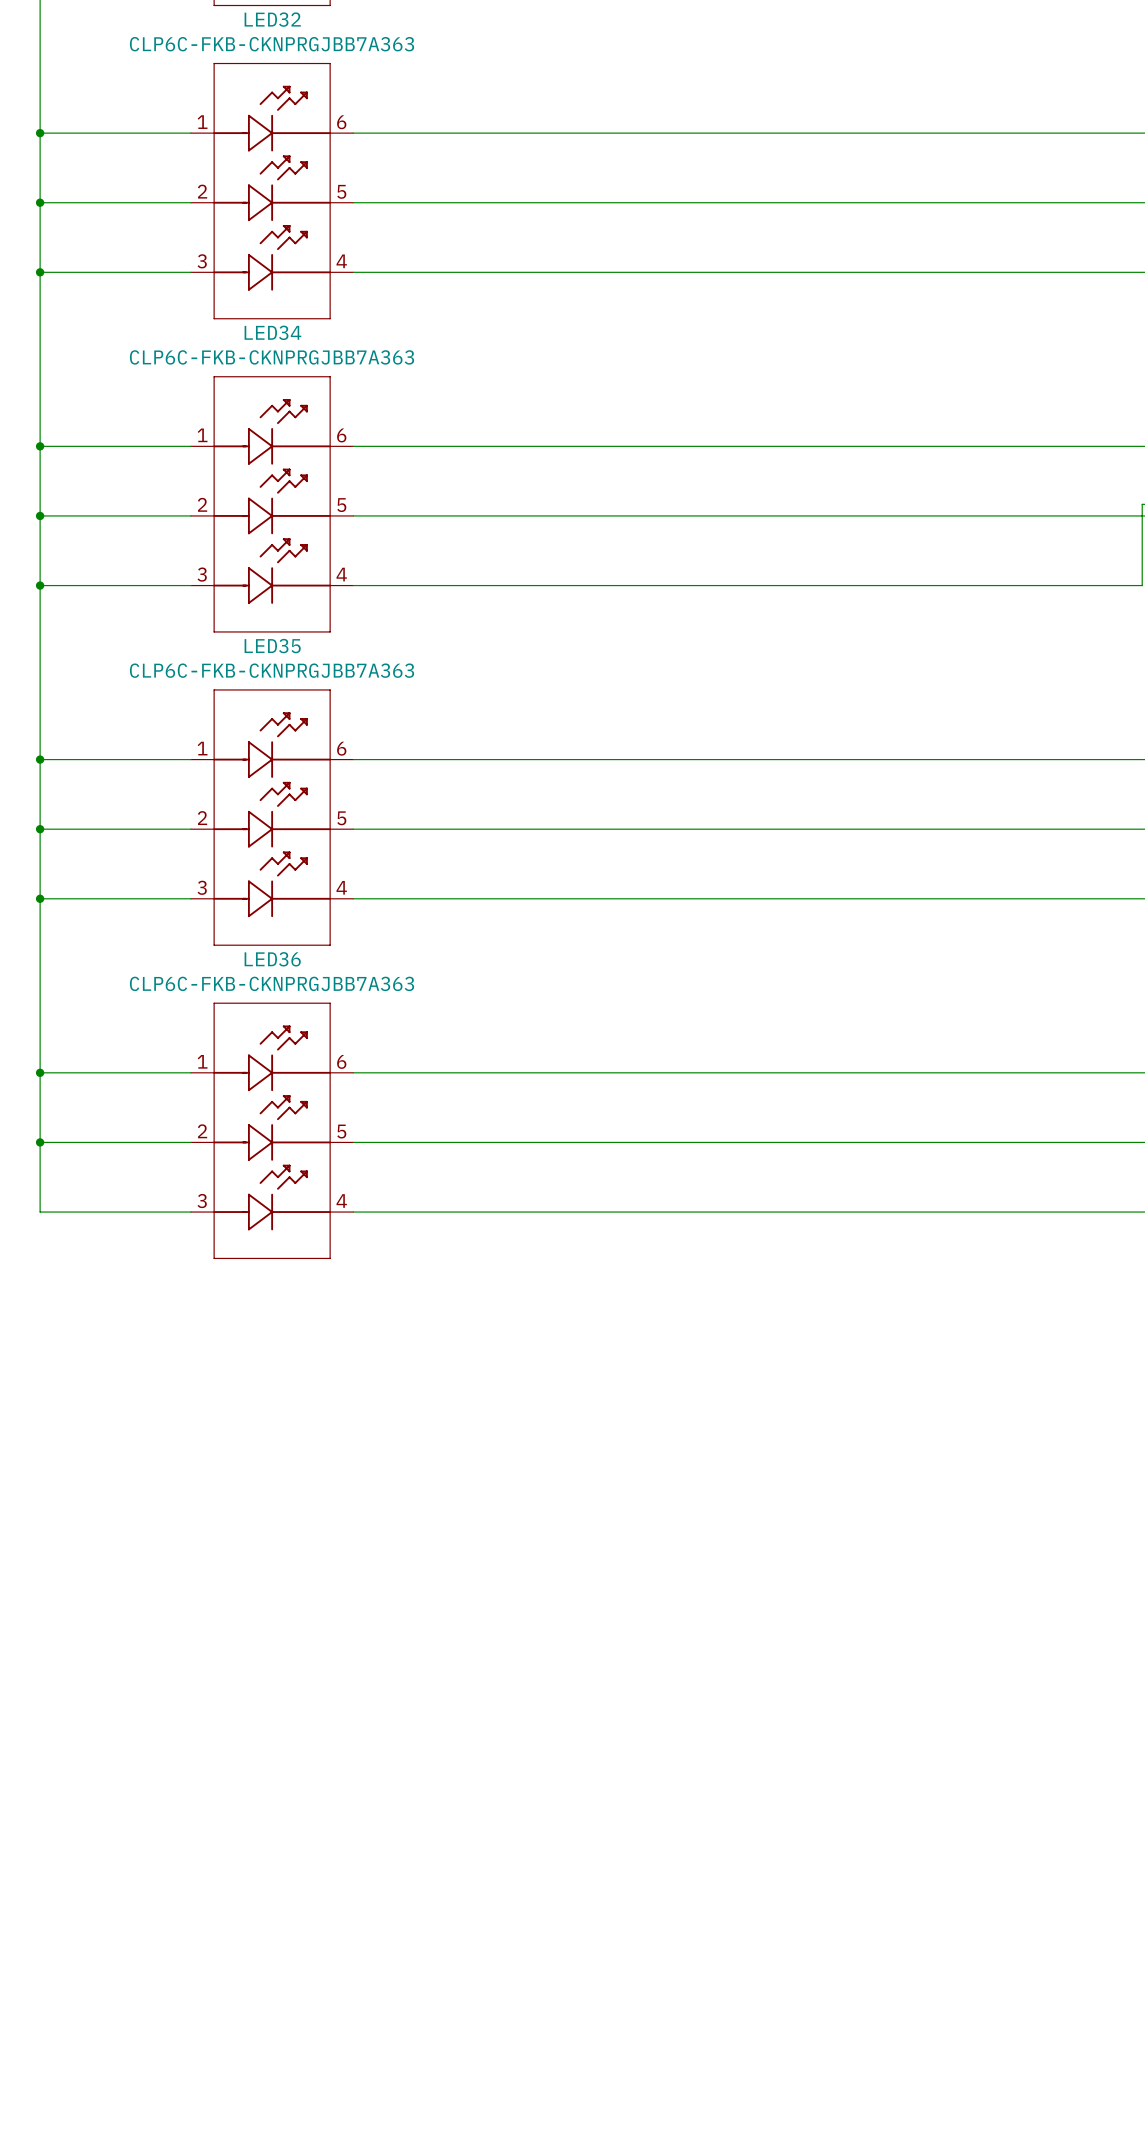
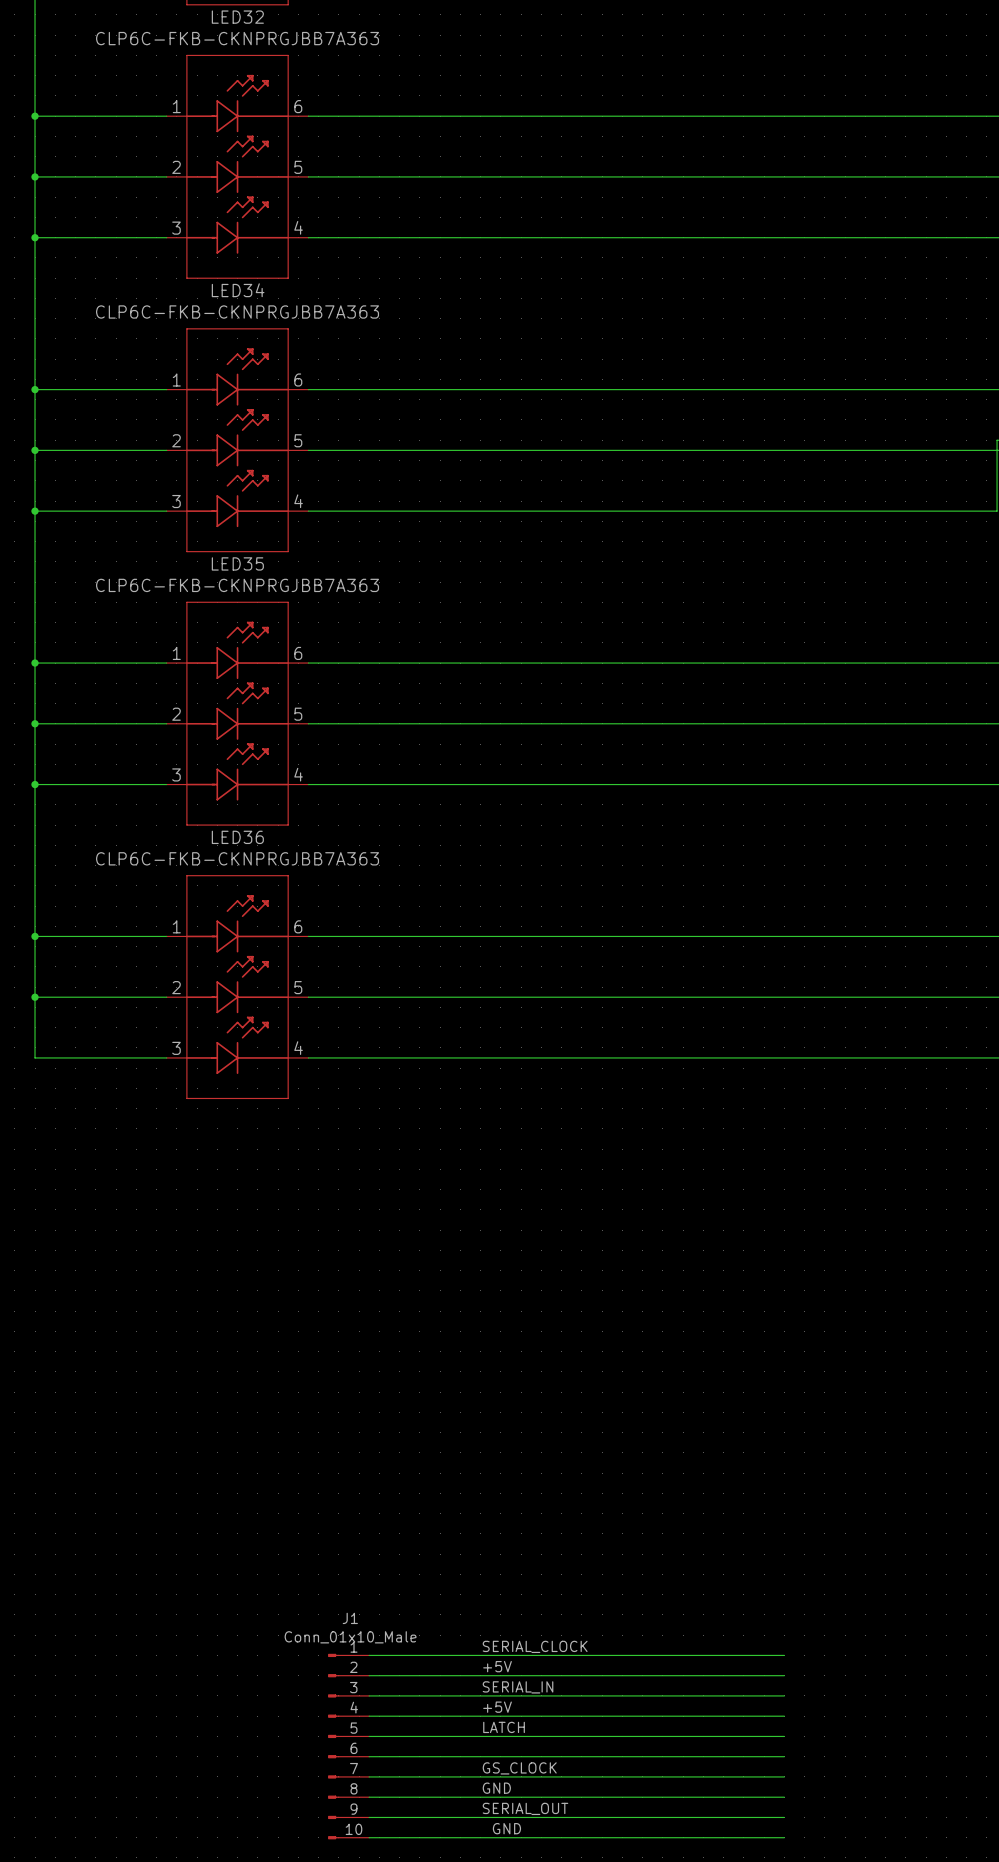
label: none -> SERIAL_CLOCK (535, 1646)
wire: none -> (369, 1655) (784, 1655)
label: none -> +5V (497, 1666)
wire: none -> (369, 1675) (784, 1675)
label: none -> SERIAL_IN (518, 1687)
wire: none -> (369, 1695) (784, 1695)
label: none -> +5V (497, 1707)
wire: none -> (369, 1716) (784, 1716)
label: none -> LATCH (504, 1727)
wire: none -> (369, 1736) (784, 1736)
J1: none -> Conn_01x10_Male (348, 1746)
wire: none -> (369, 1756) (784, 1756)
label: none -> GS_CLOCK (519, 1768)
wire: none -> (369, 1776) (784, 1776)
label: none -> GND (496, 1788)
wire: none -> (369, 1797) (784, 1797)
label: none -> SERIAL_OUT (525, 1808)
wire: none -> (369, 1817) (784, 1817)
label: none -> GND (506, 1828)
wire: none -> (369, 1837) (784, 1837)

